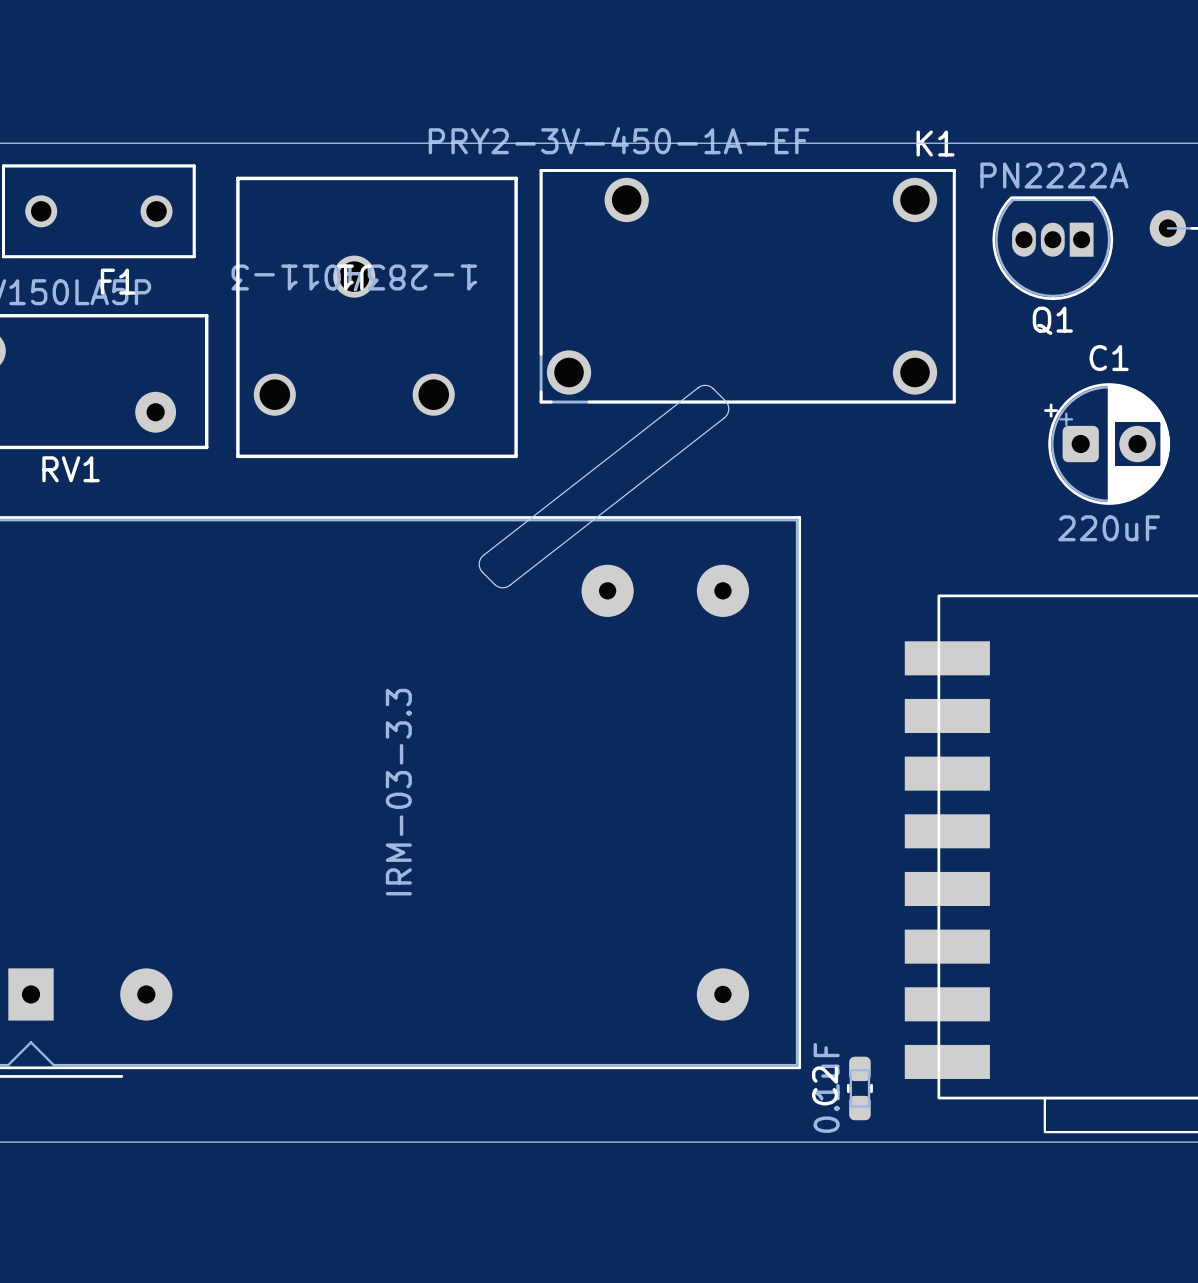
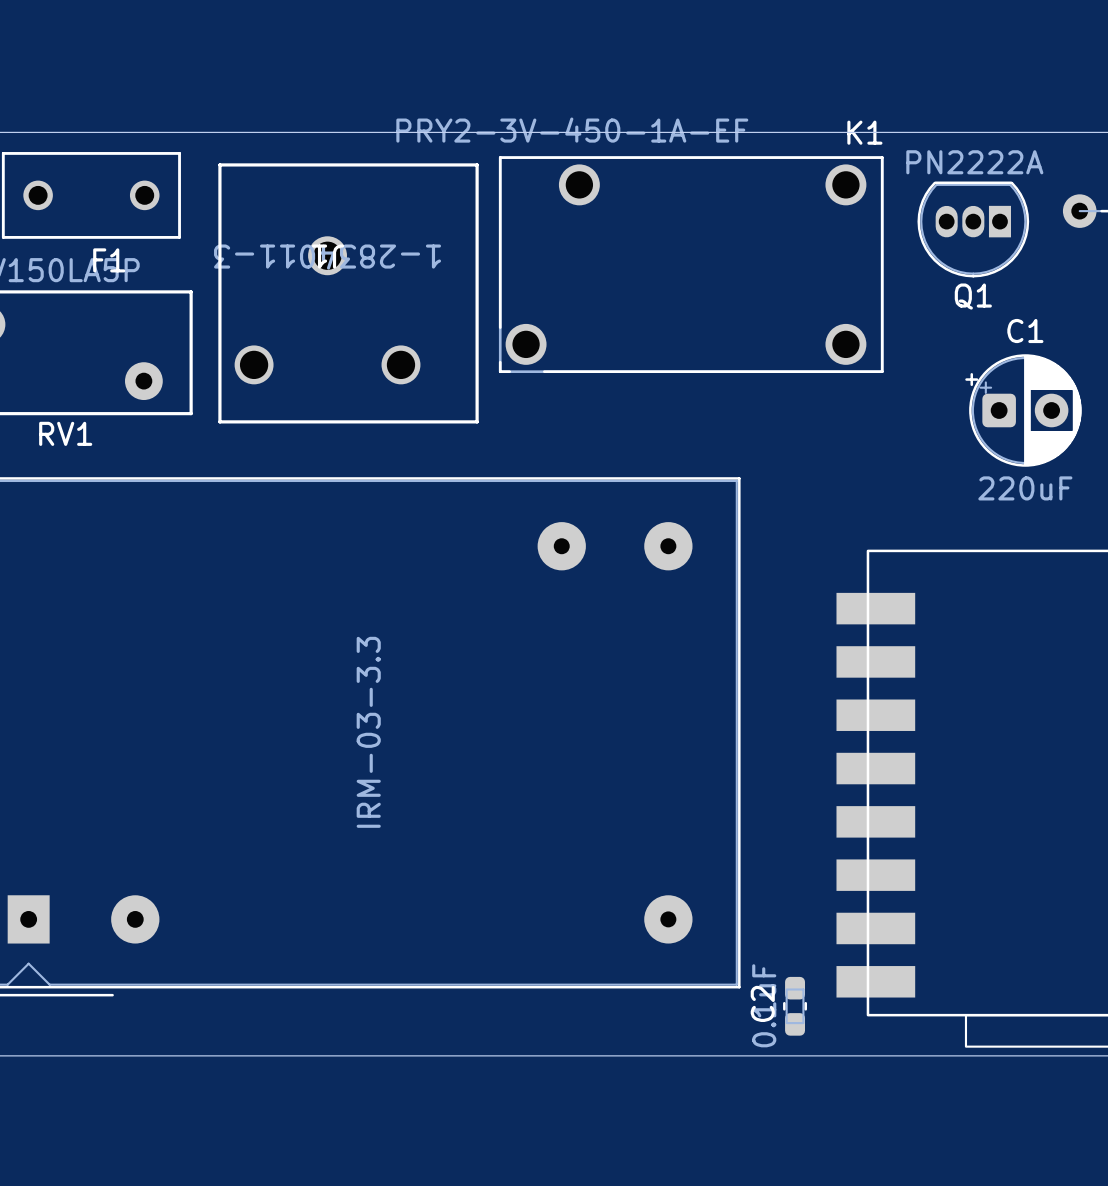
board edge: (698, 387) (483, 555) (479, 562) (481, 571) (496, 586) (503, 587) (508, 586) (725, 416) (728, 409) (725, 400) (709, 386) (703, 385) (698, 387) -> none

